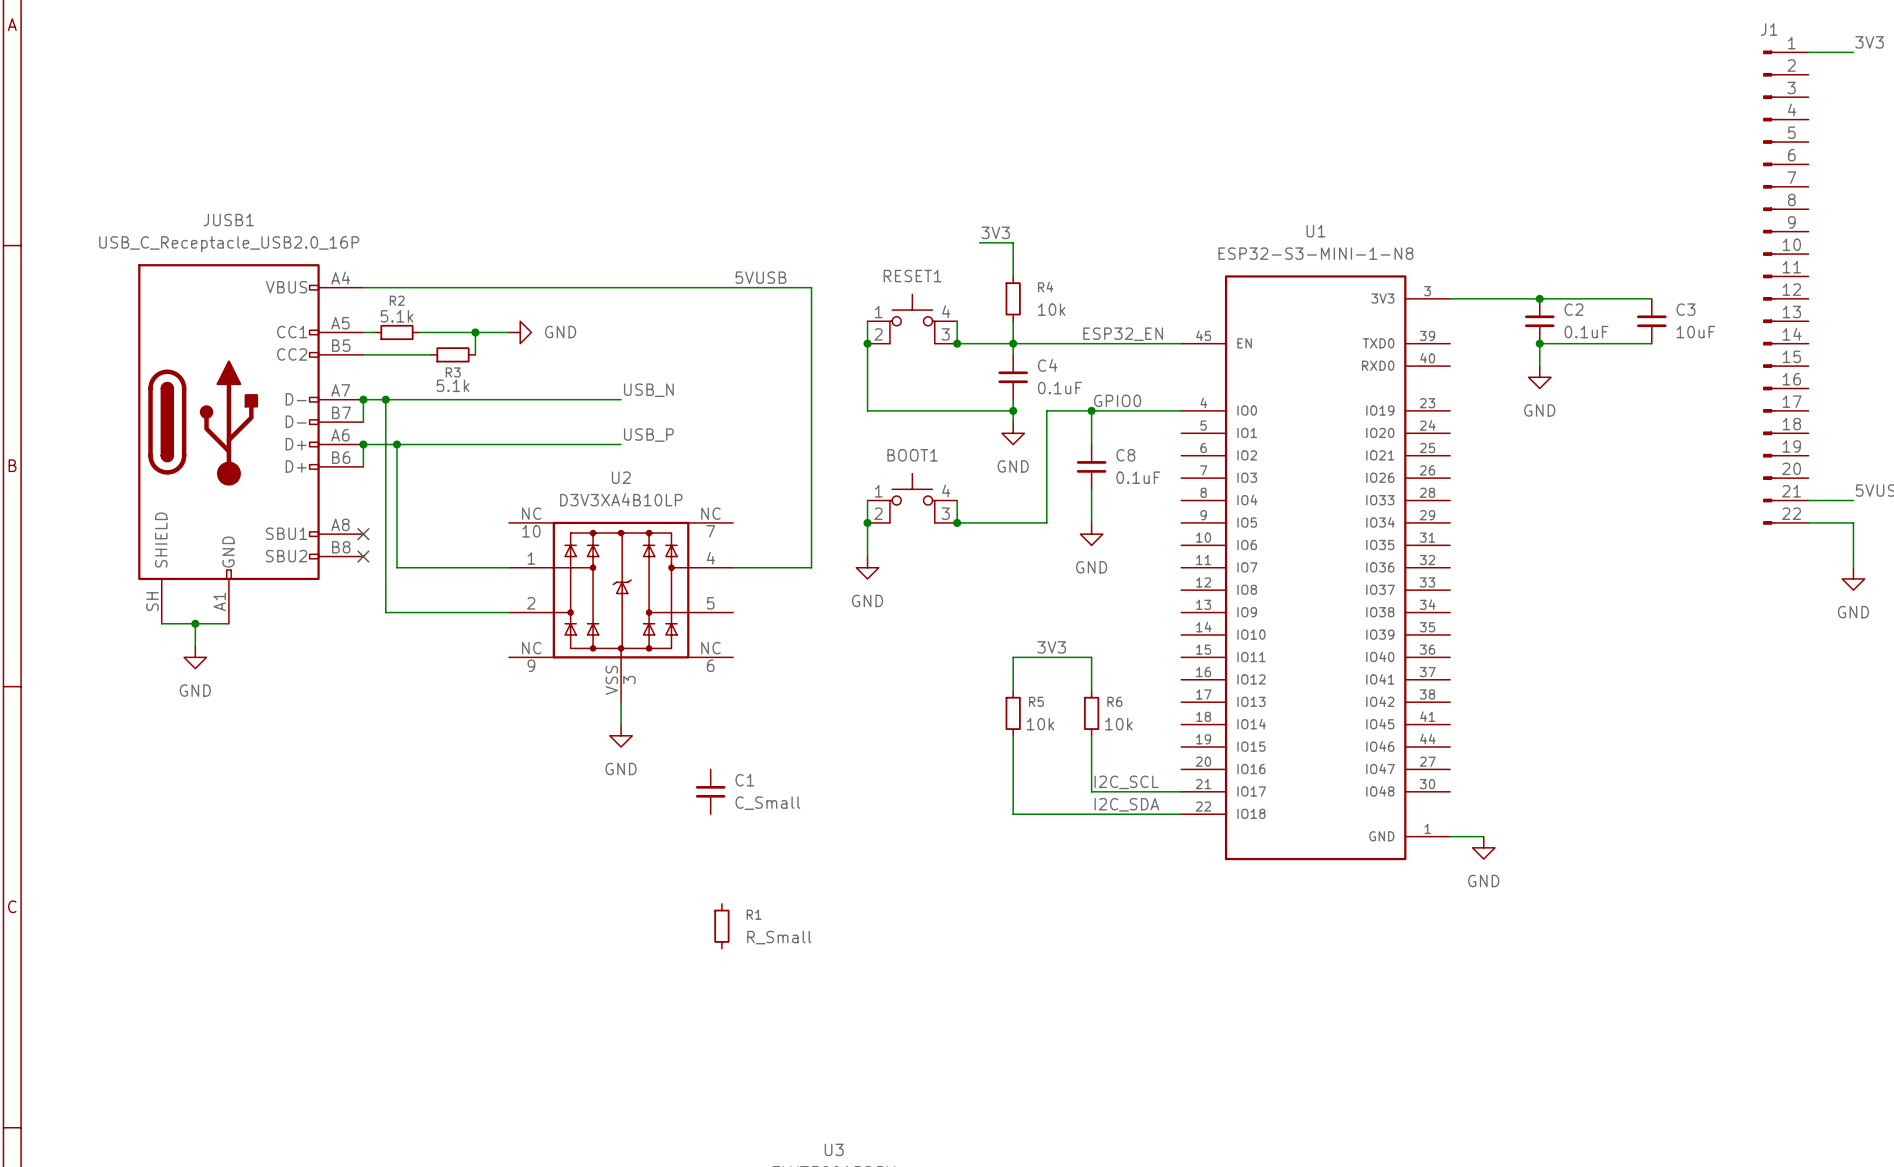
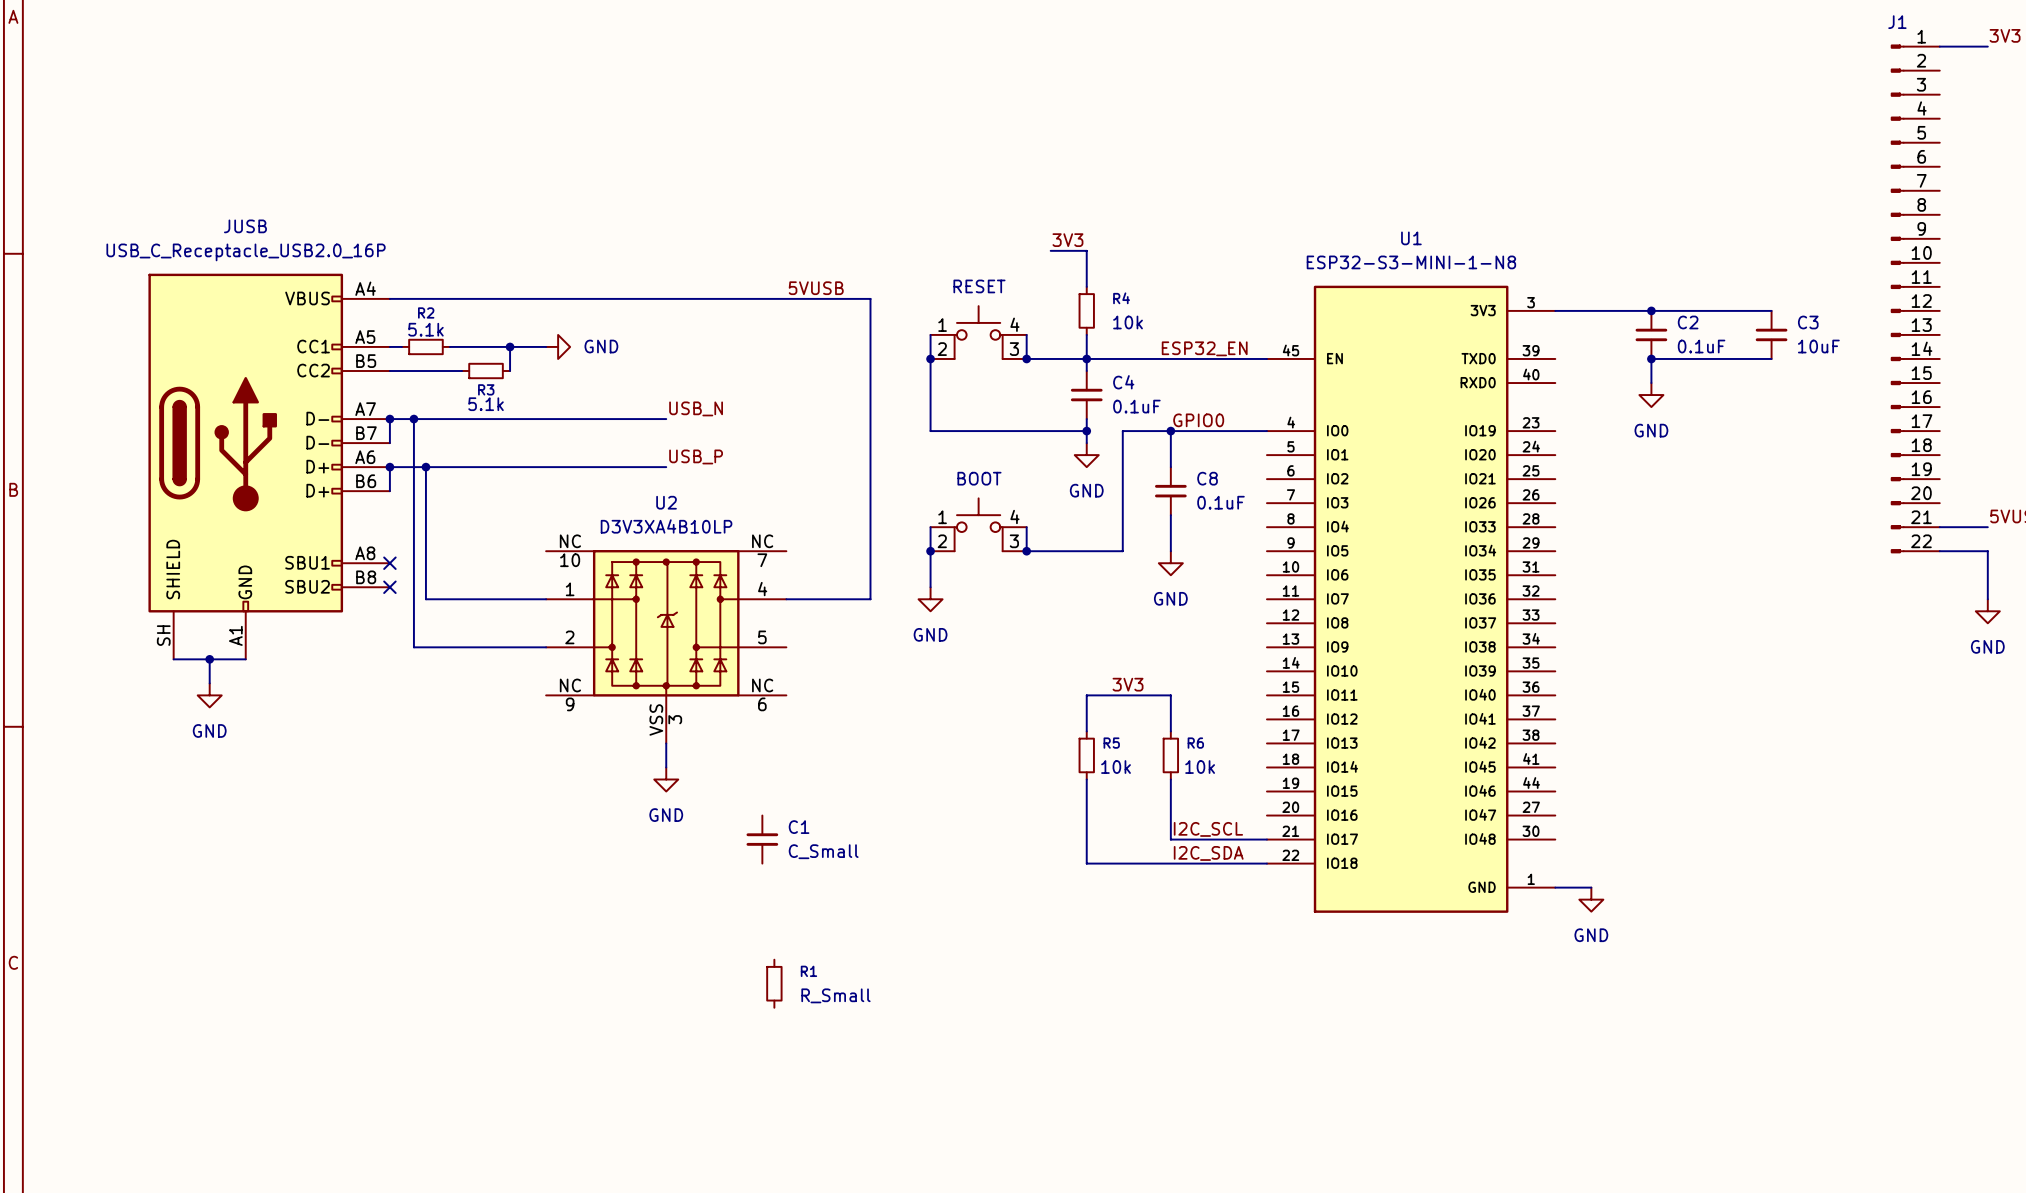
JUSB1 name: JUSB1 (228, 220) -> JUSB (245, 226)
RESET1 name: RESET1 (912, 276) -> RESET (979, 286)
BOOT1 name: BOOT1 (912, 455) -> BOOT (979, 478)

